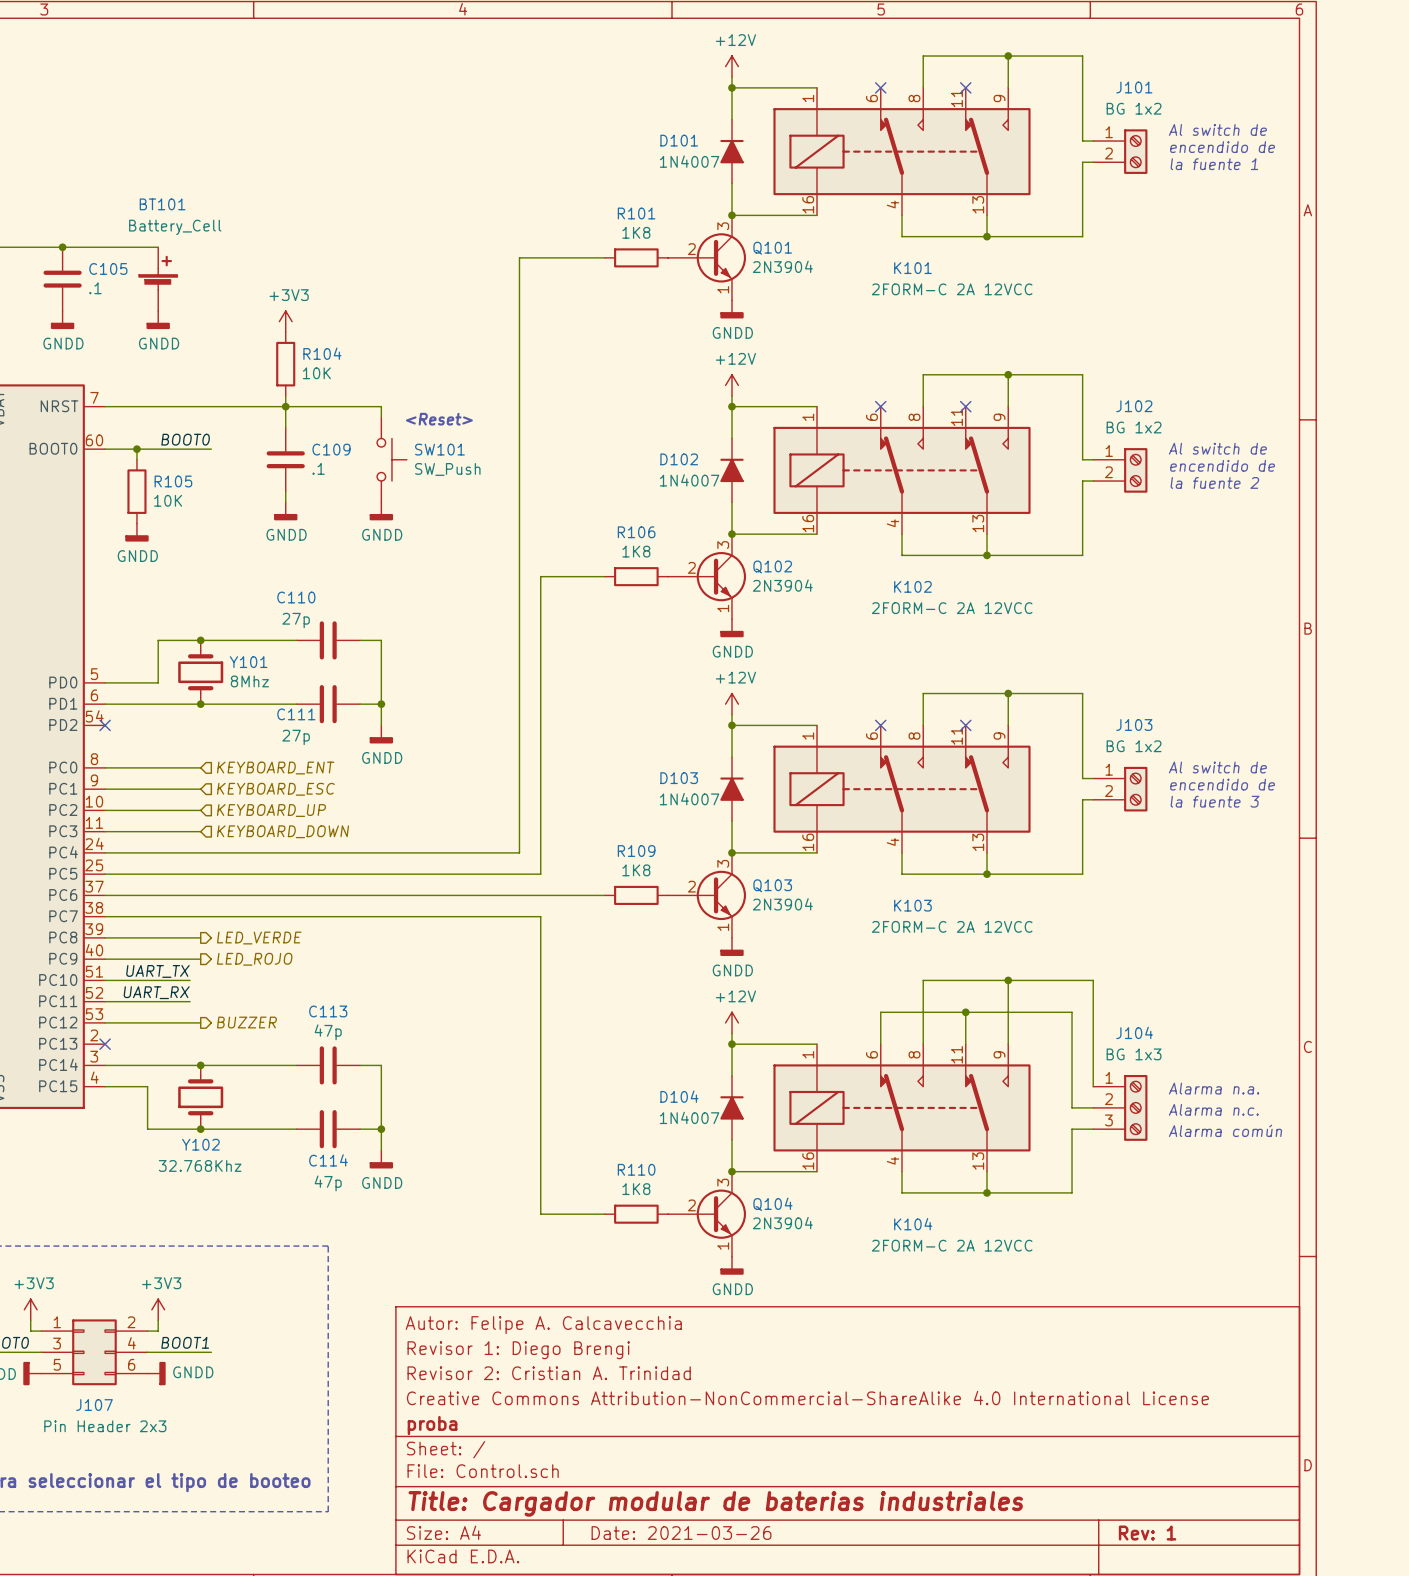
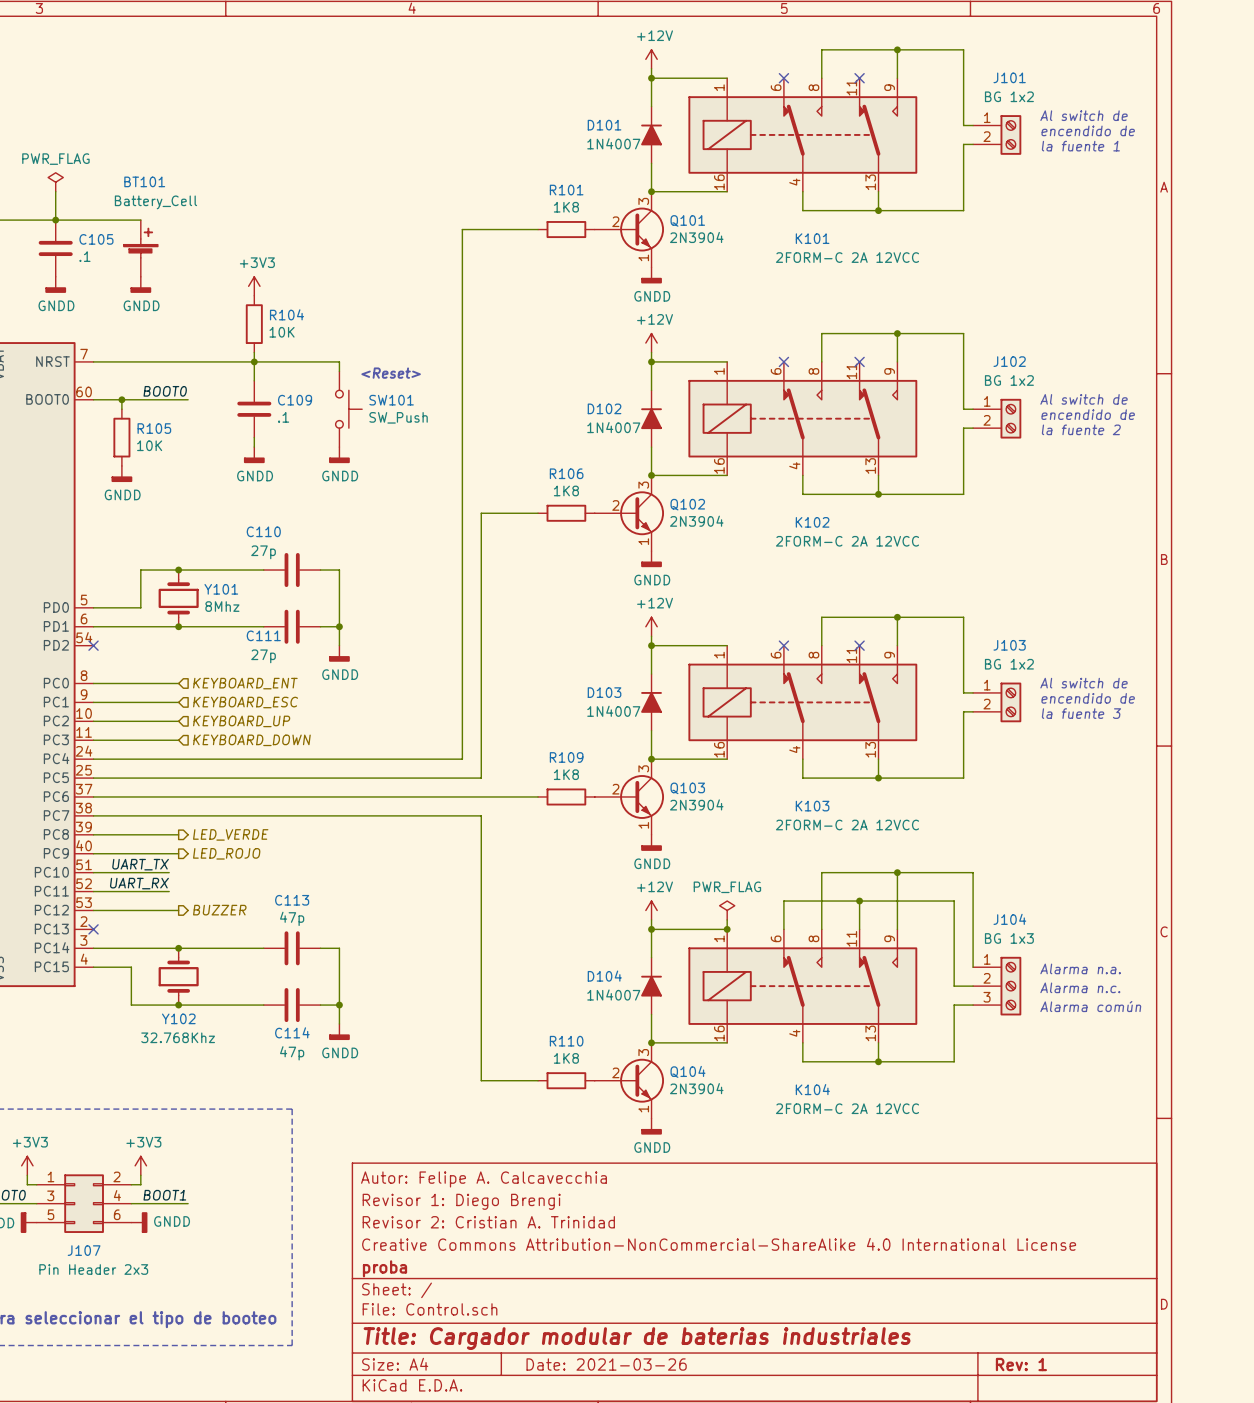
power symbol: none -> PWR_FLAG (55, 182)
wire: none -> (55, 191) (55, 220)
power symbol: none -> PWR_FLAG (727, 910)
wire: none -> (727, 919) (727, 929)
junction: none -> (727, 929)

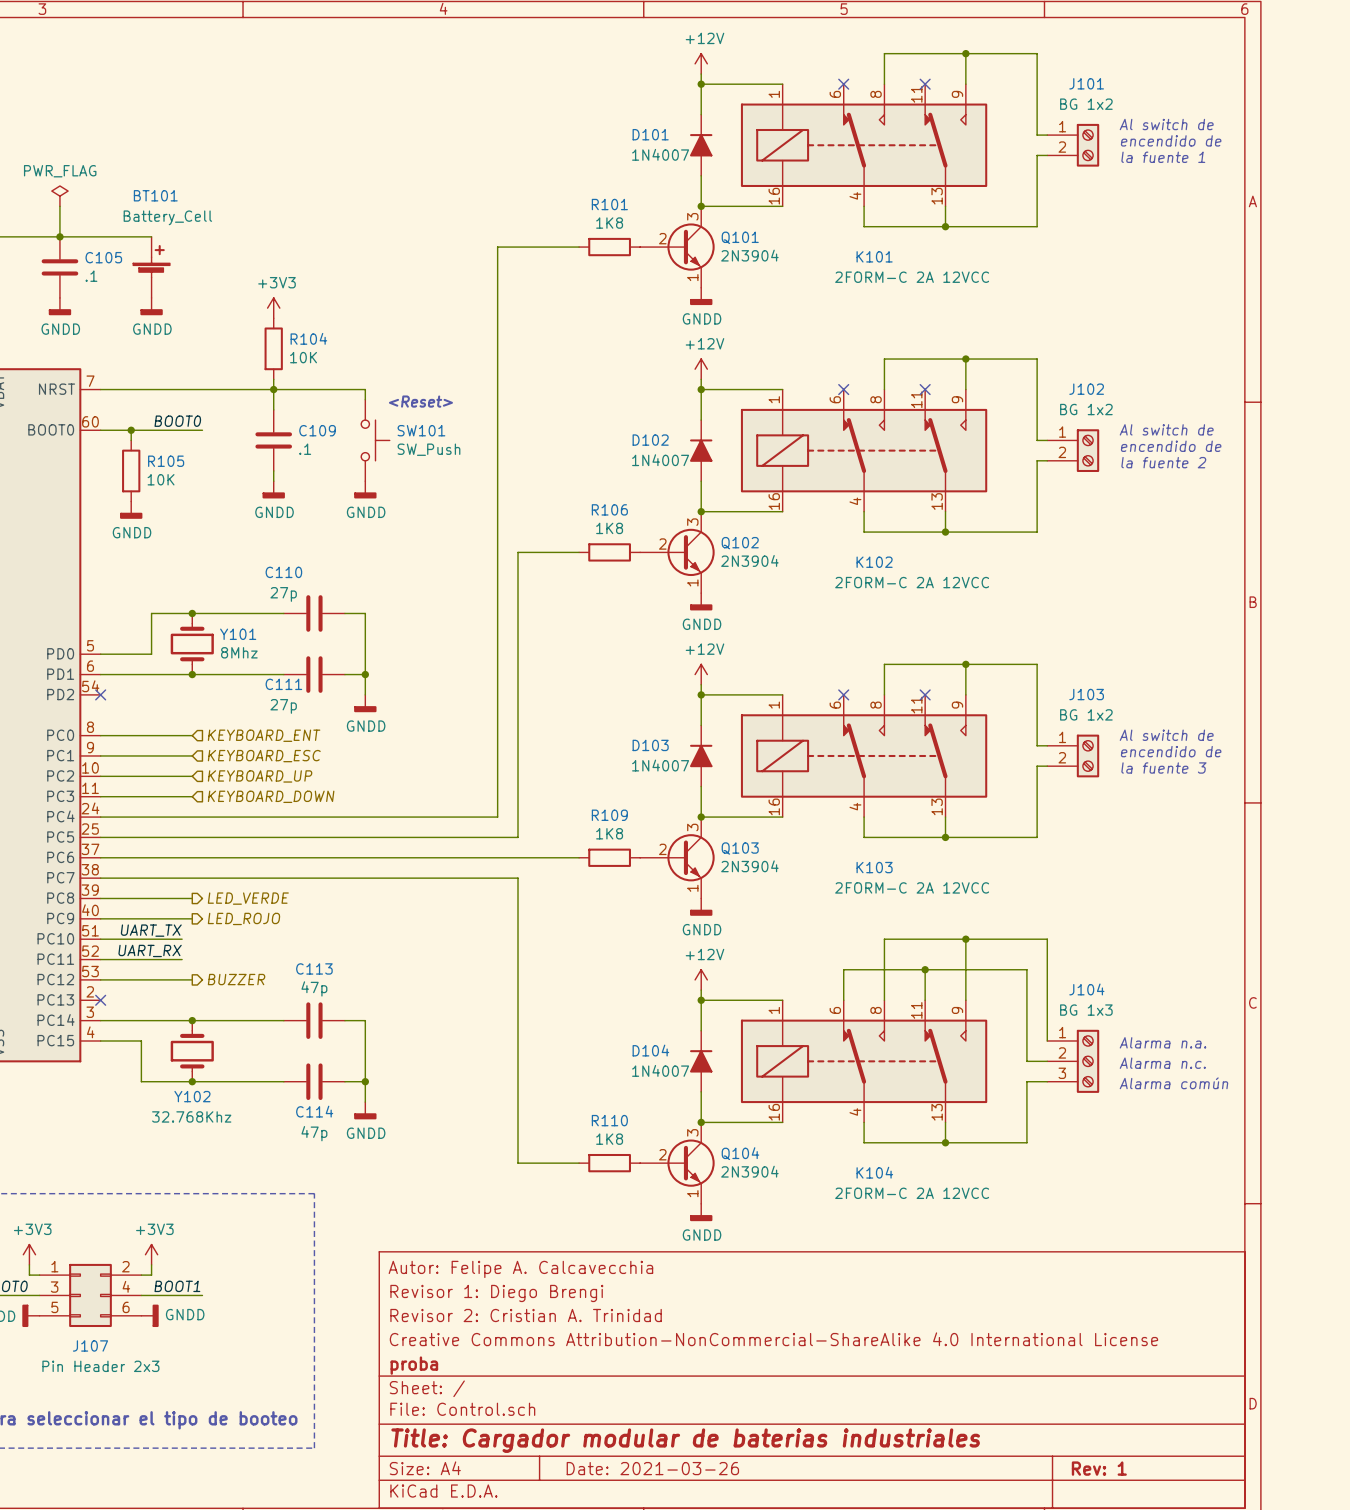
power symbol: PWR_FLAG (727, 910) -> none
wire: (727, 919) (727, 929) -> none
junction: (727, 929) -> none

